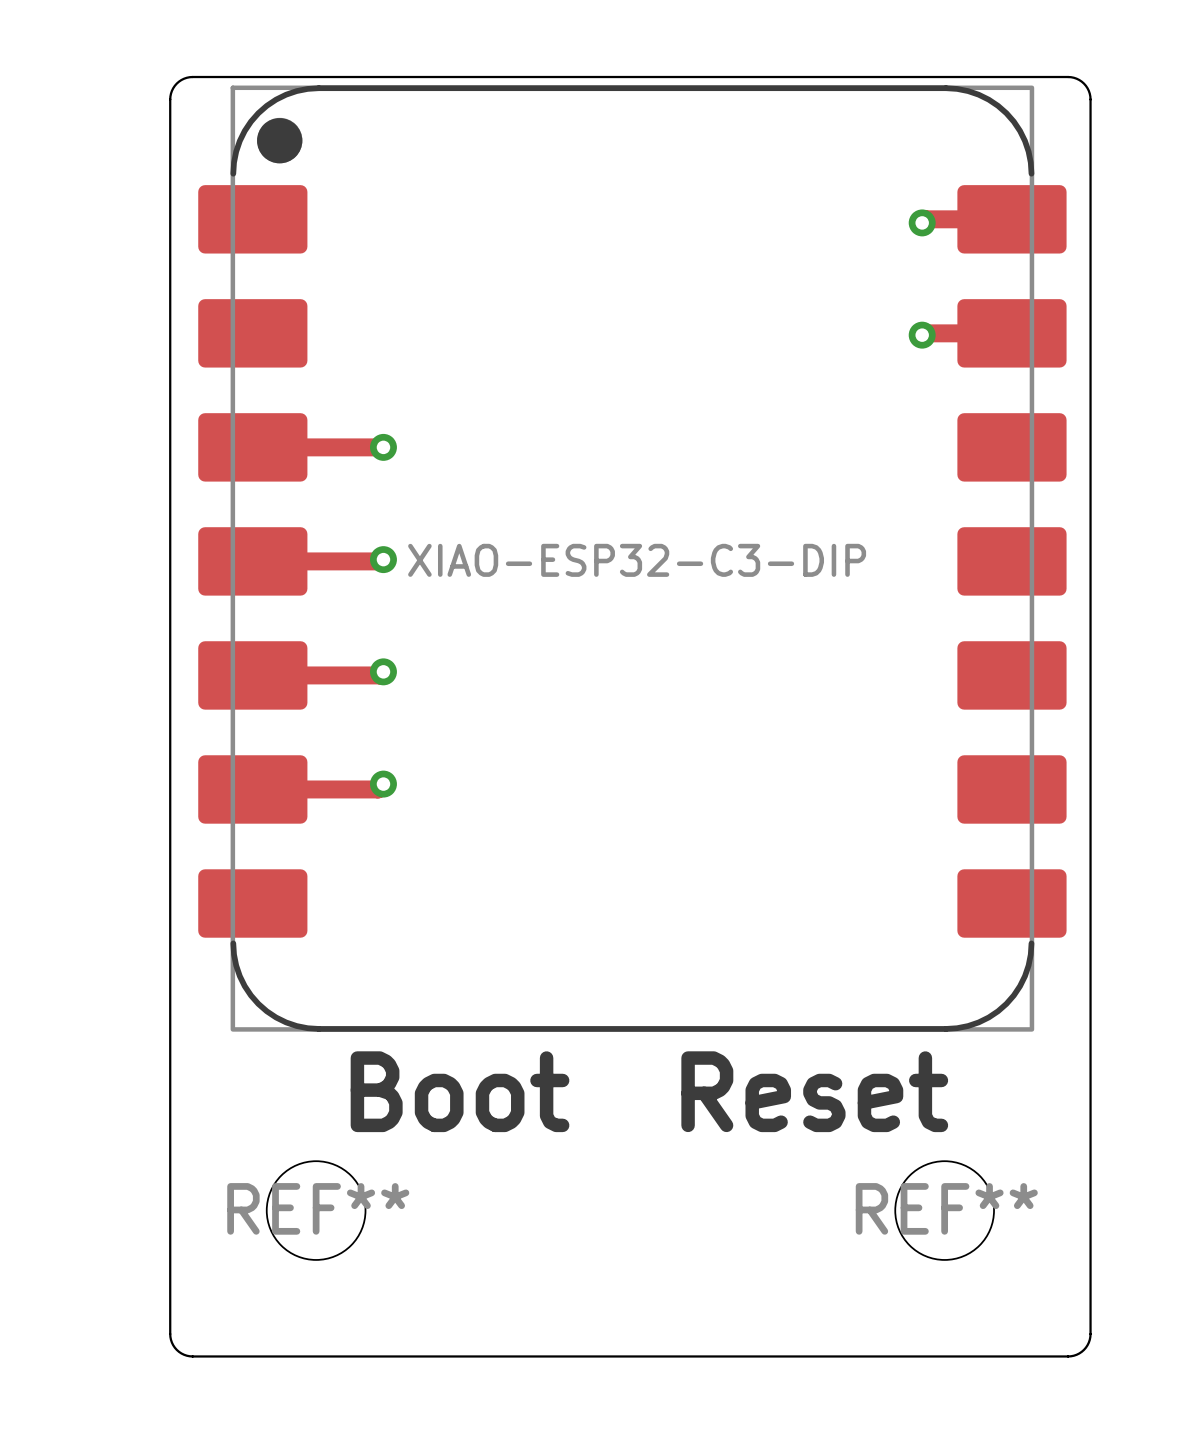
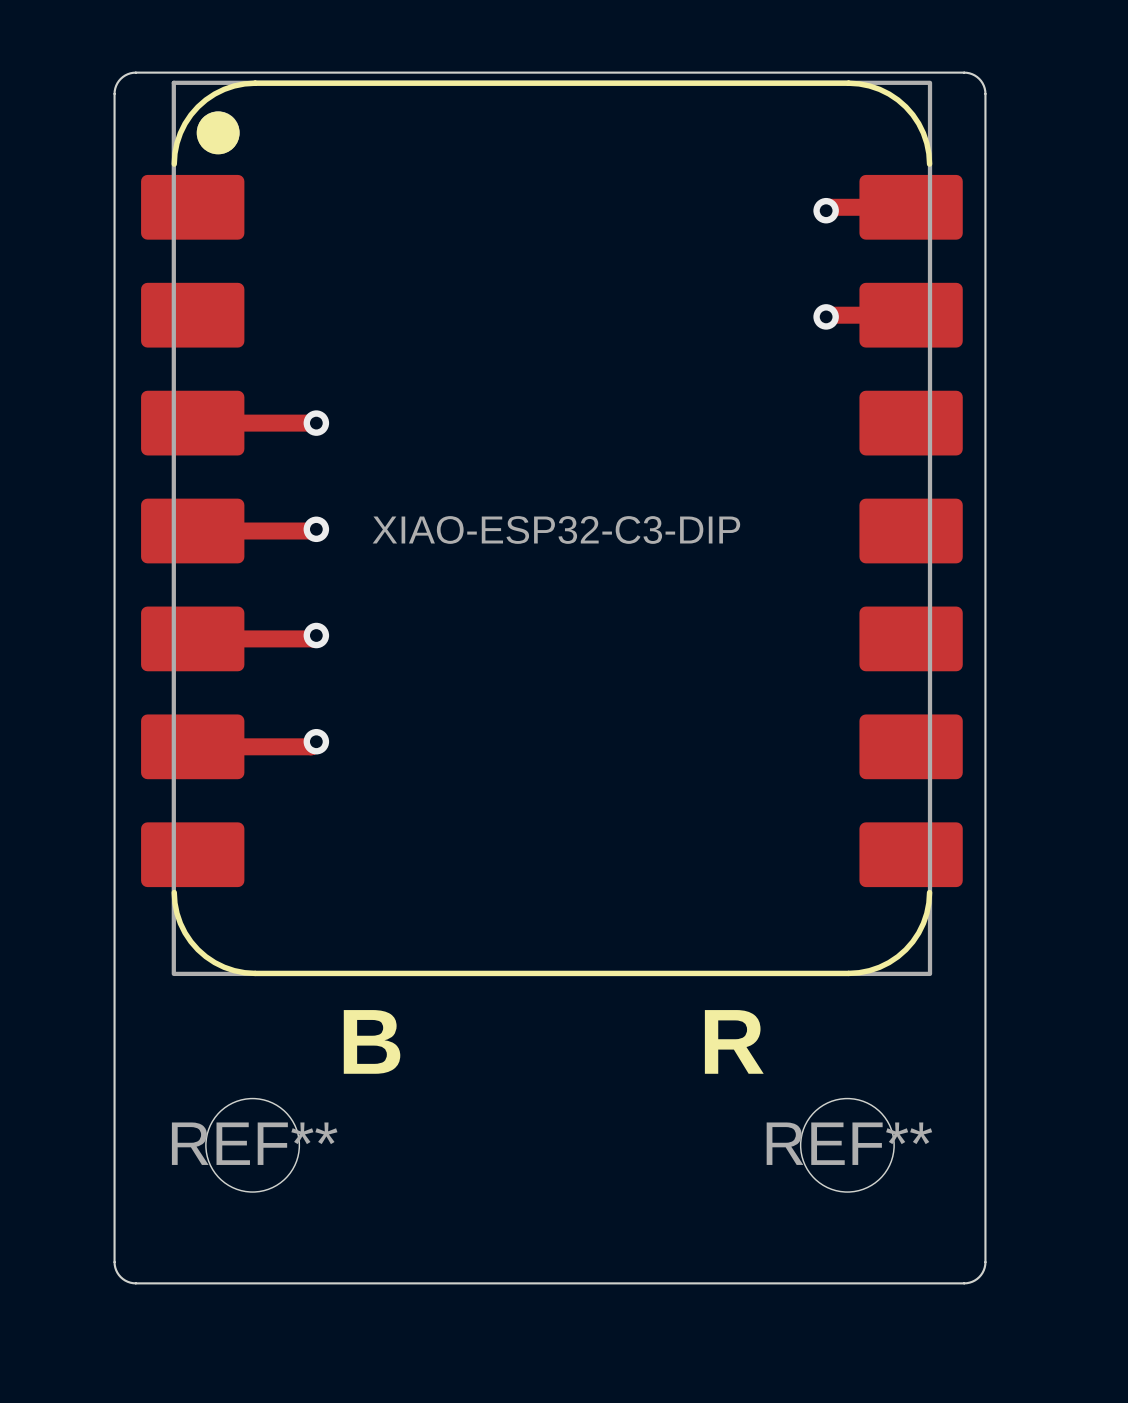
text: Boot (460, 1091) -> none
text: Reset (814, 1091) -> none
text: none -> B (372, 1041)
text: none -> R (734, 1041)

